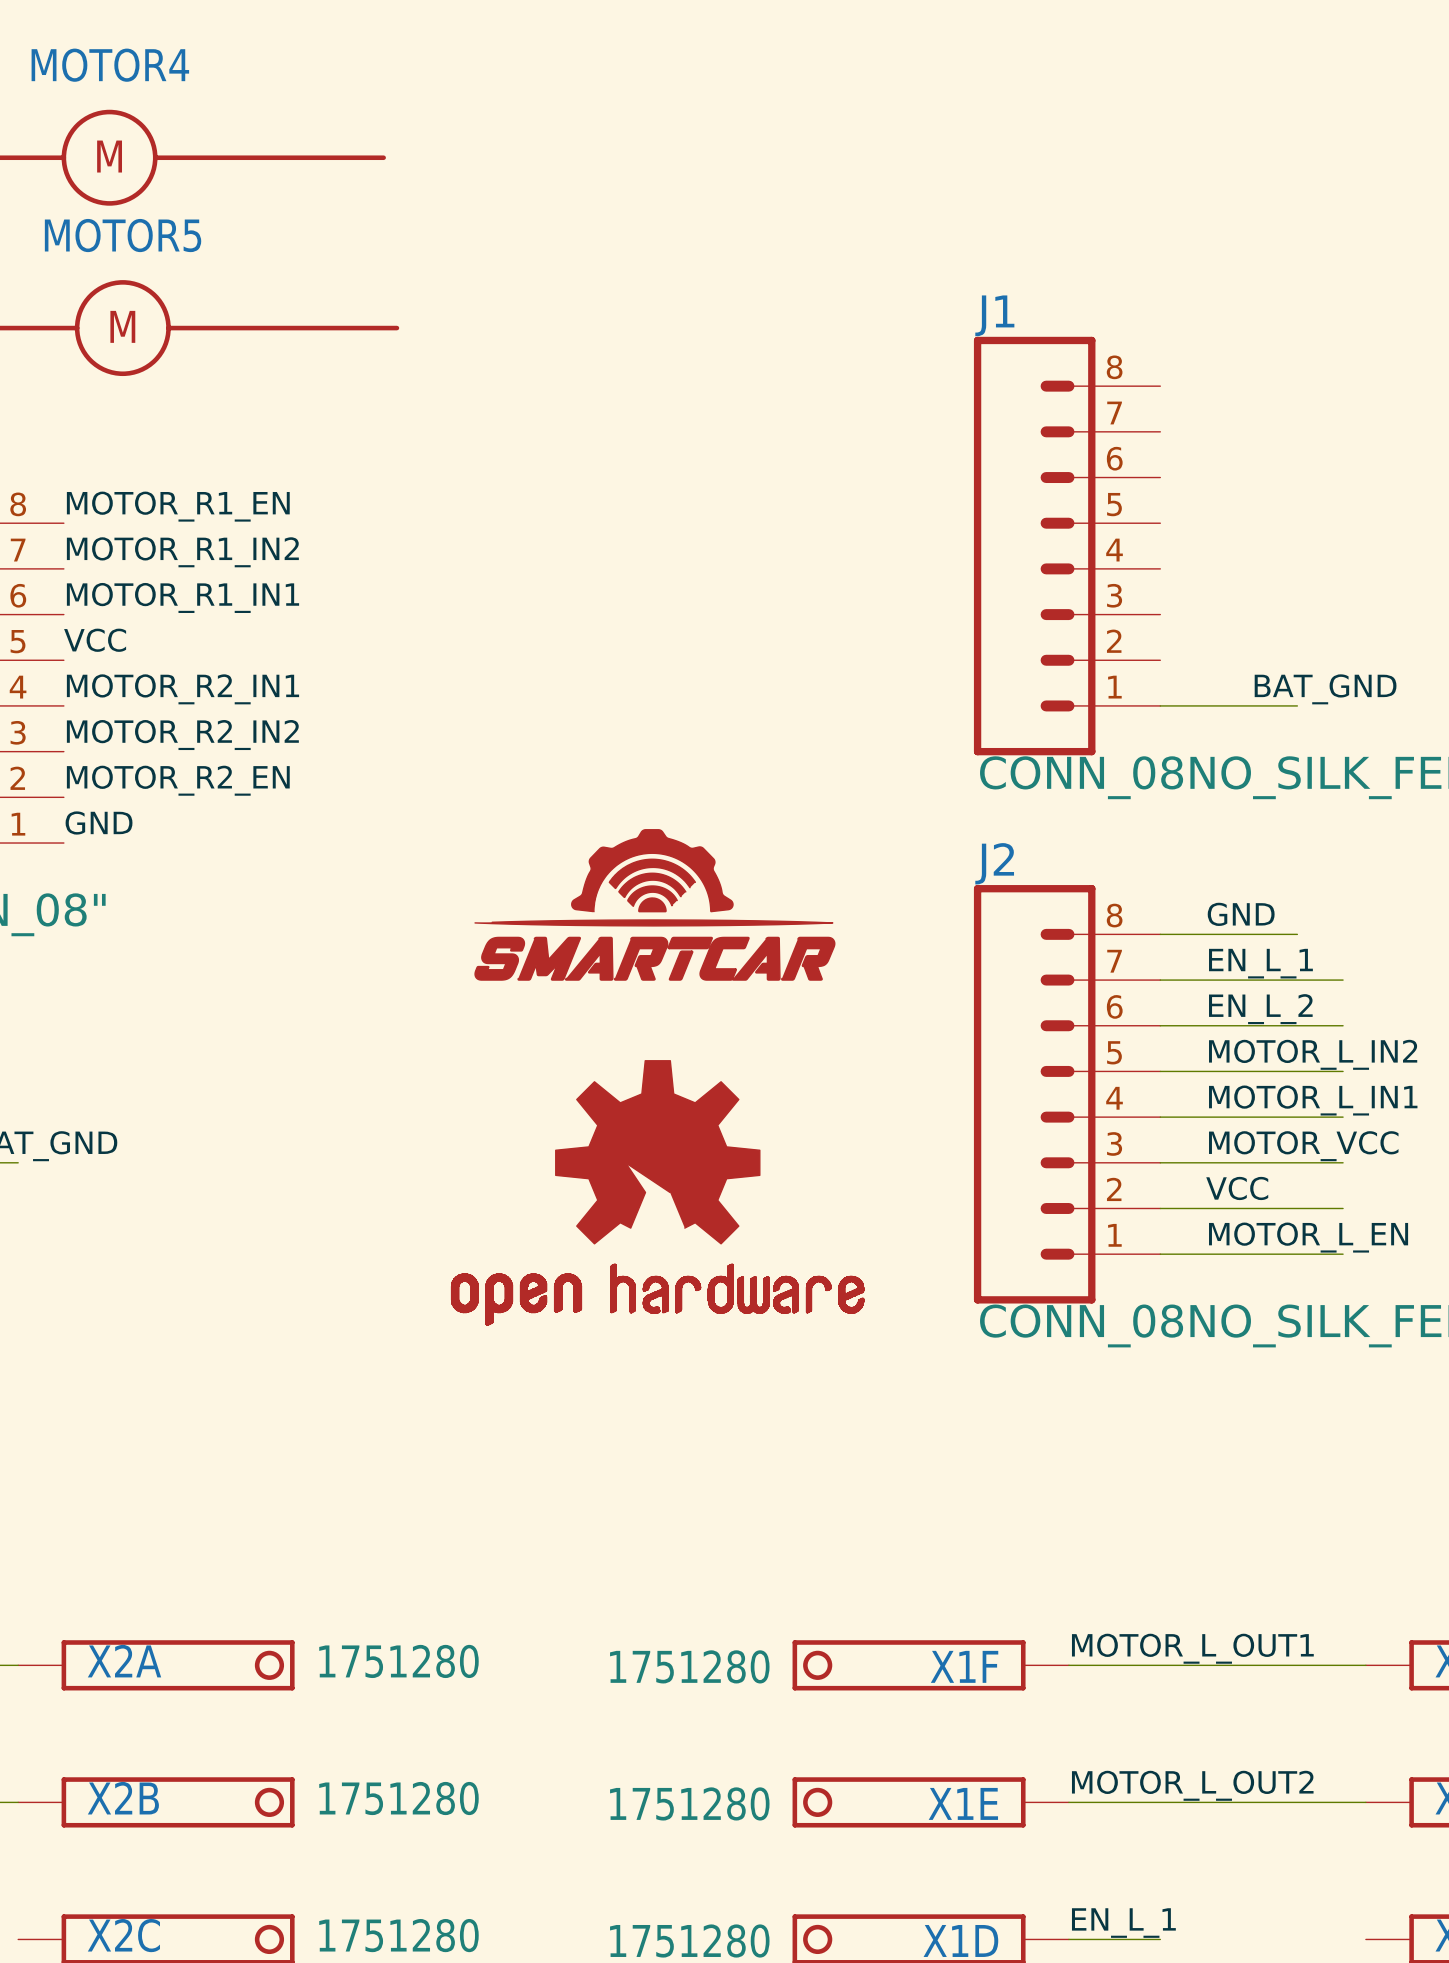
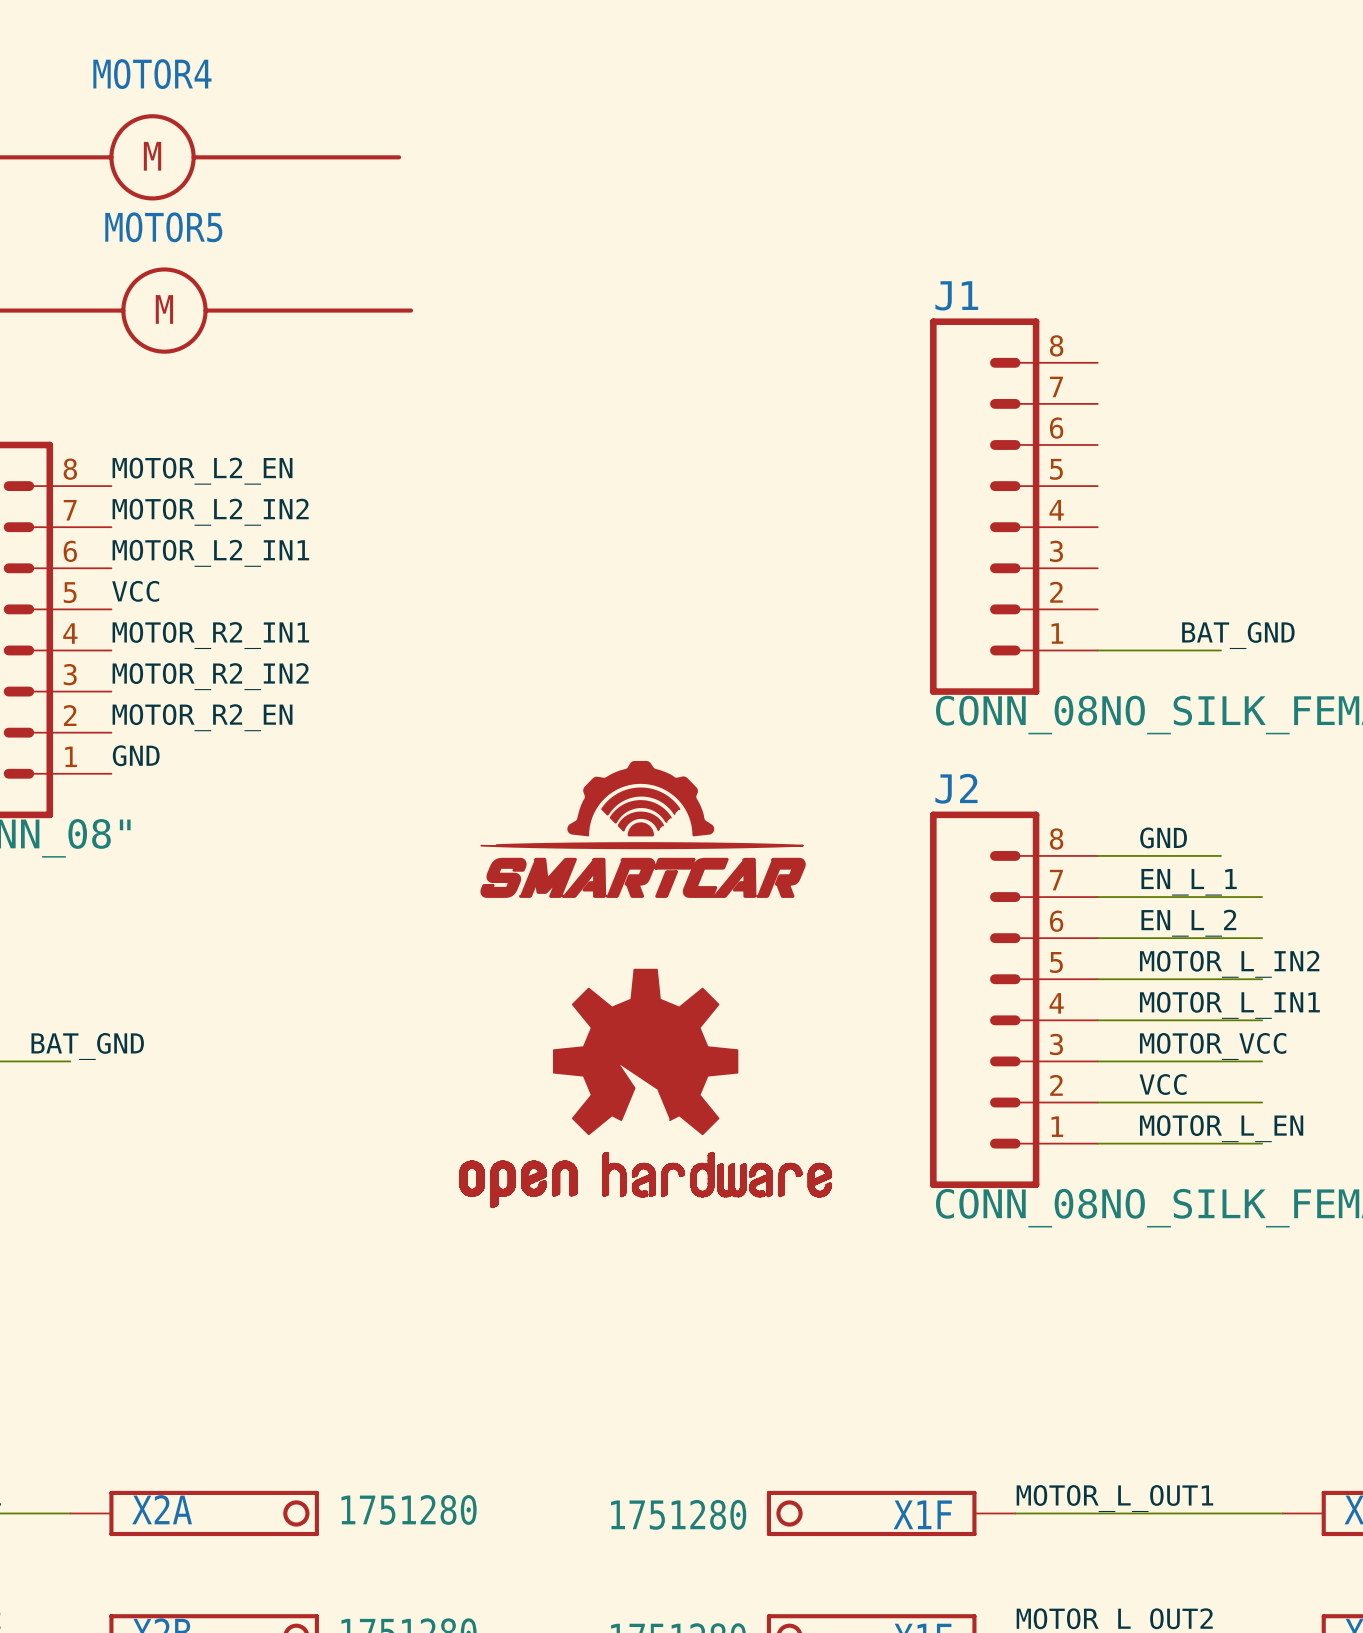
label: MOTOR_R1_EN (178, 506) -> MOTOR_L2_EN (202, 471)
label: MOTOR_R1_IN2 (182, 552) -> MOTOR_L2_IN2 (210, 512)
label: MOTOR_R1_IN1 (182, 597) -> MOTOR_L2_IN1 (210, 553)

